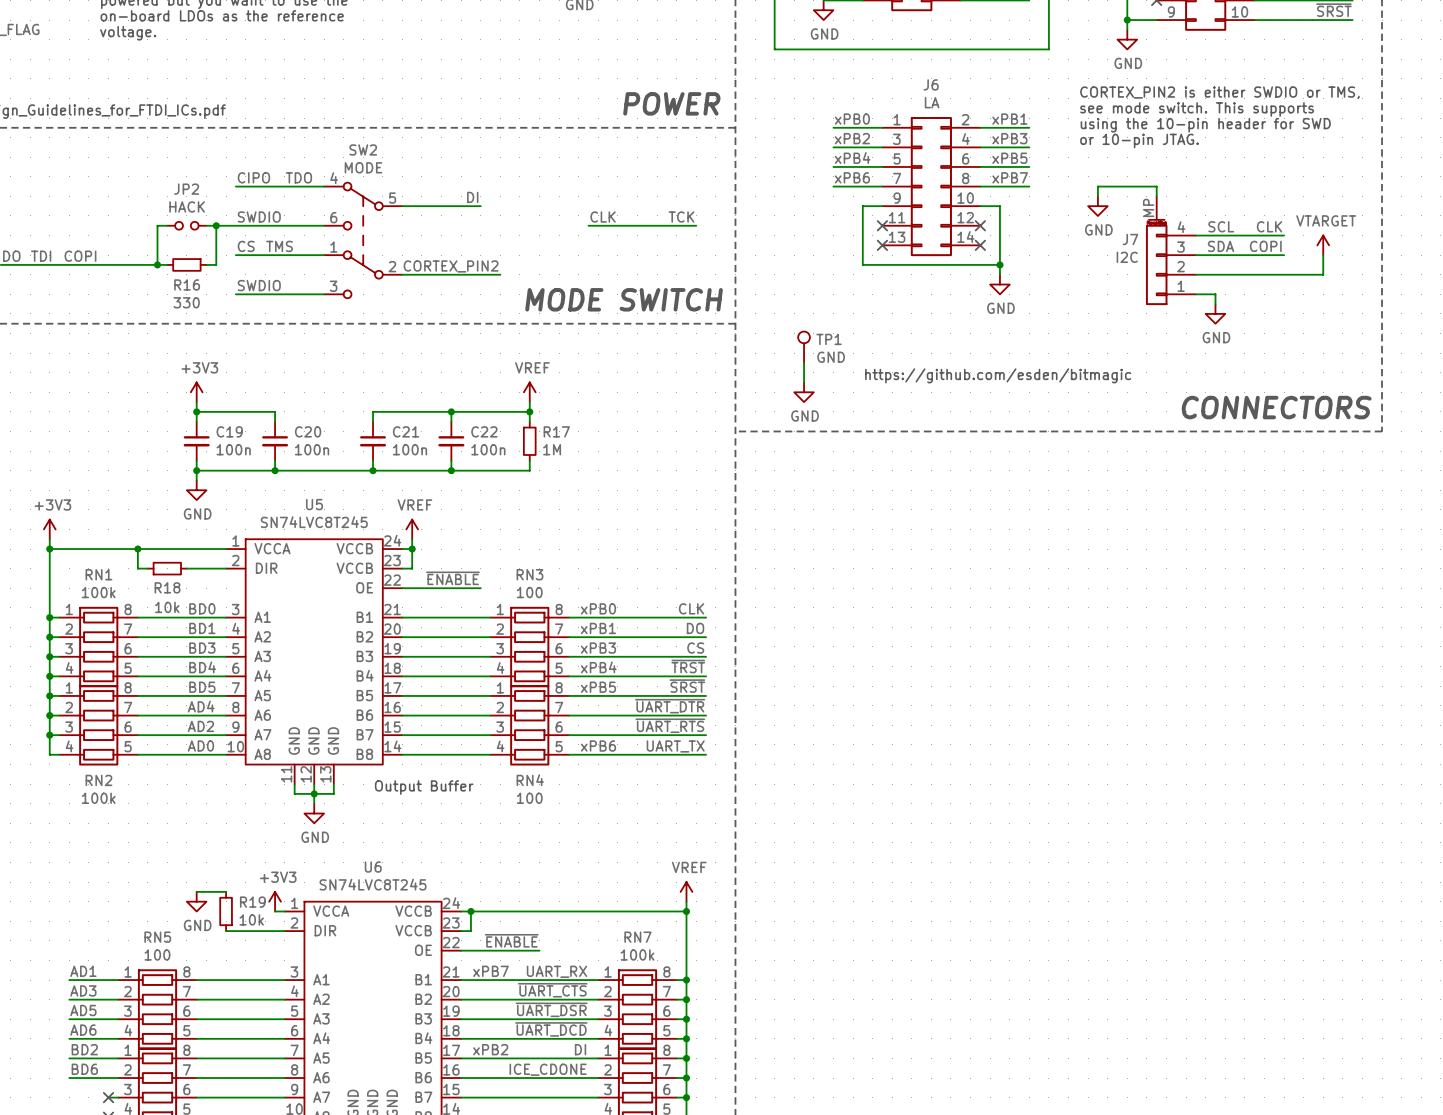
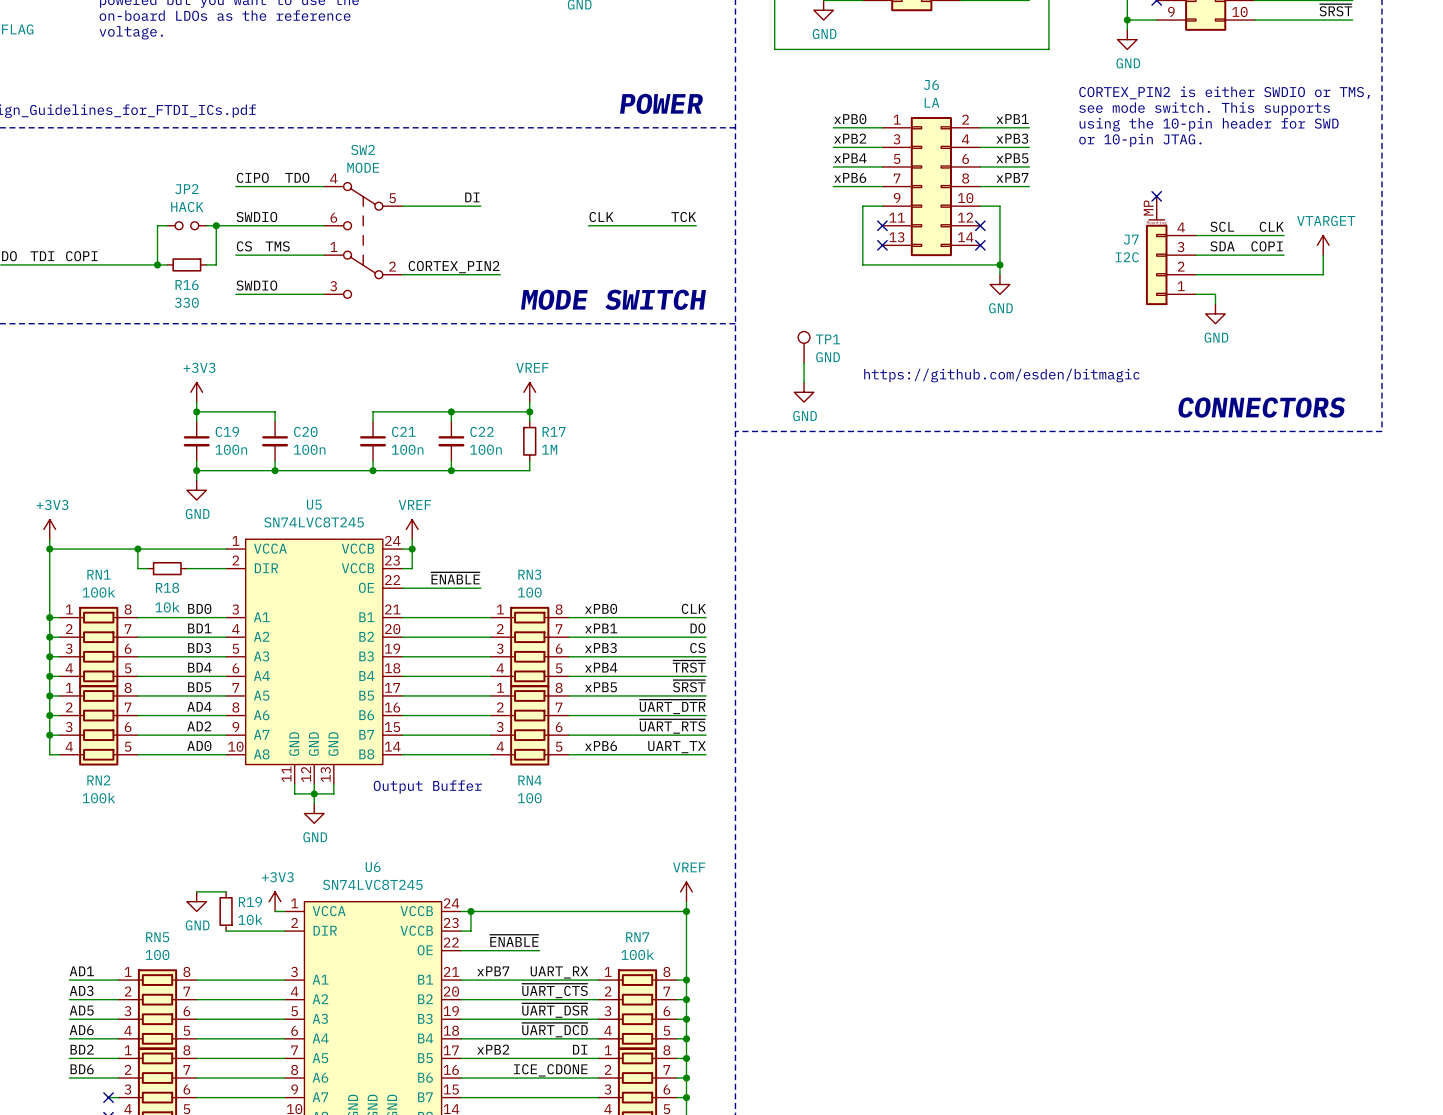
wire: (1097, 196) (1097, 186) (1156, 186) (1156, 196) -> none
no-connect mark: none -> (1156, 196)
power symbol: GND (1097, 206) -> none

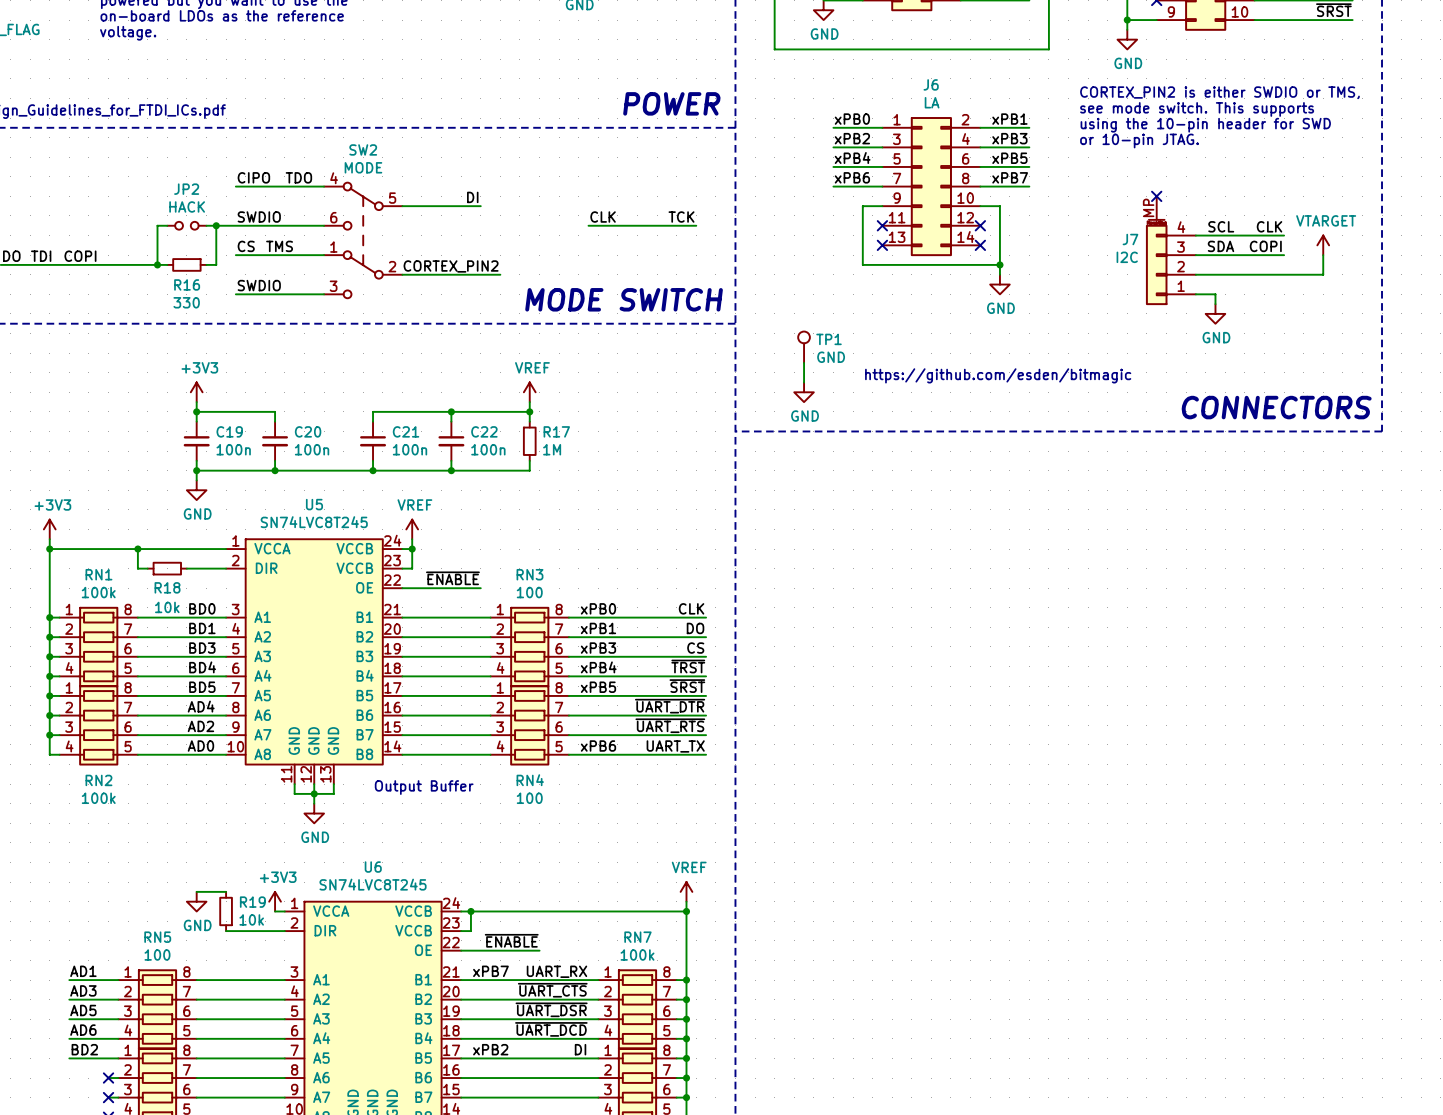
label: BD6 (82, 1069) -> none
label: ICE_CDONE (550, 1070) -> none
wire: (69, 1078) (108, 1078) -> none
no-connect mark: none -> (108, 1078)

